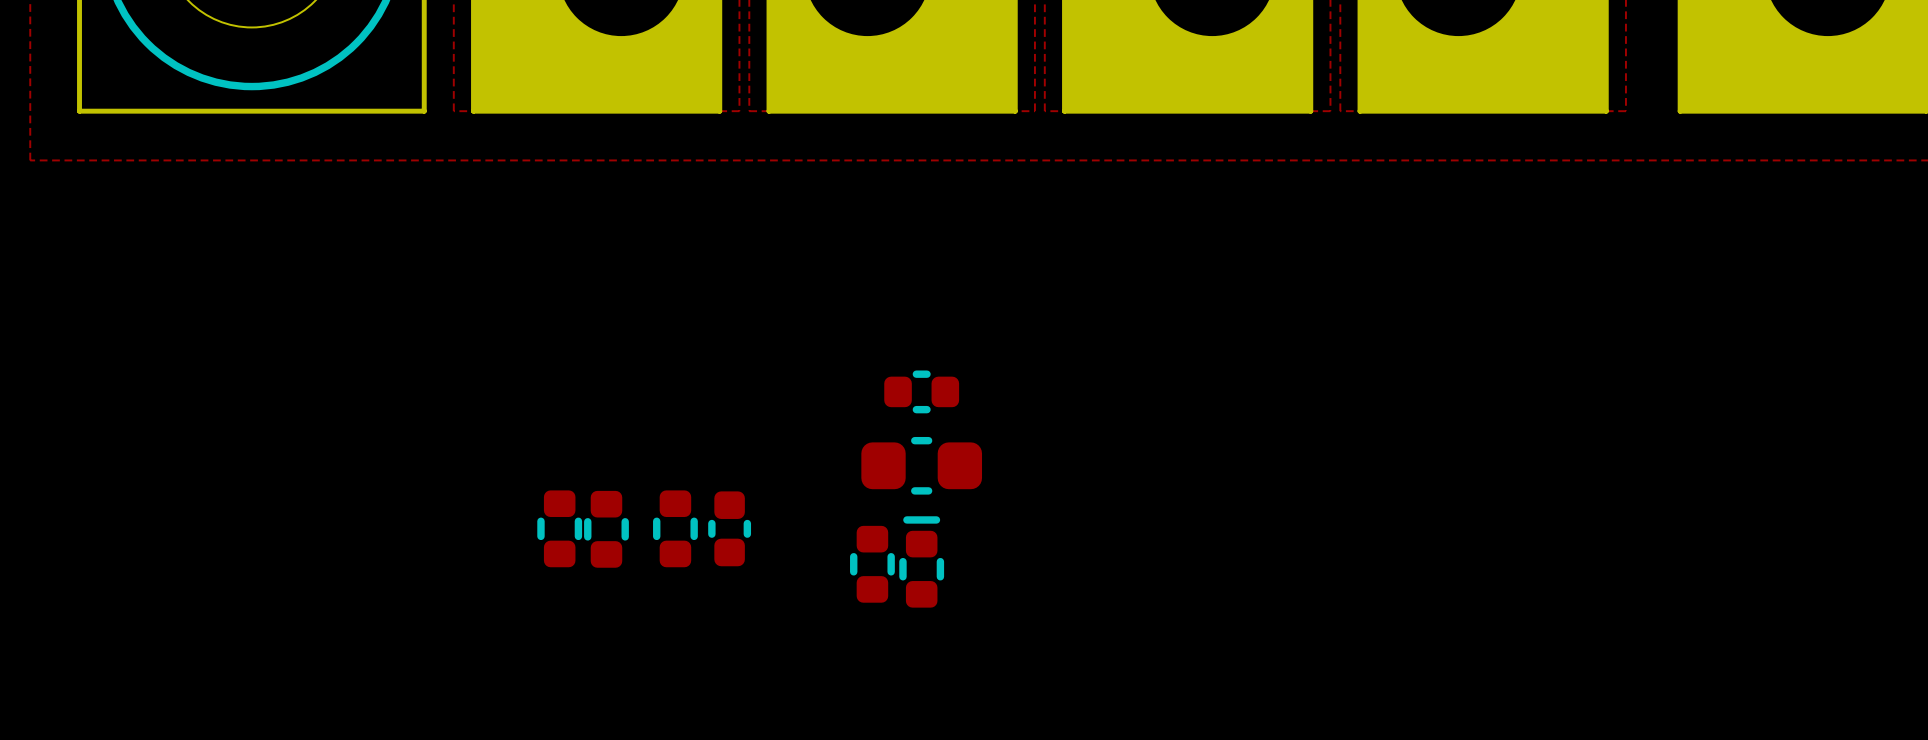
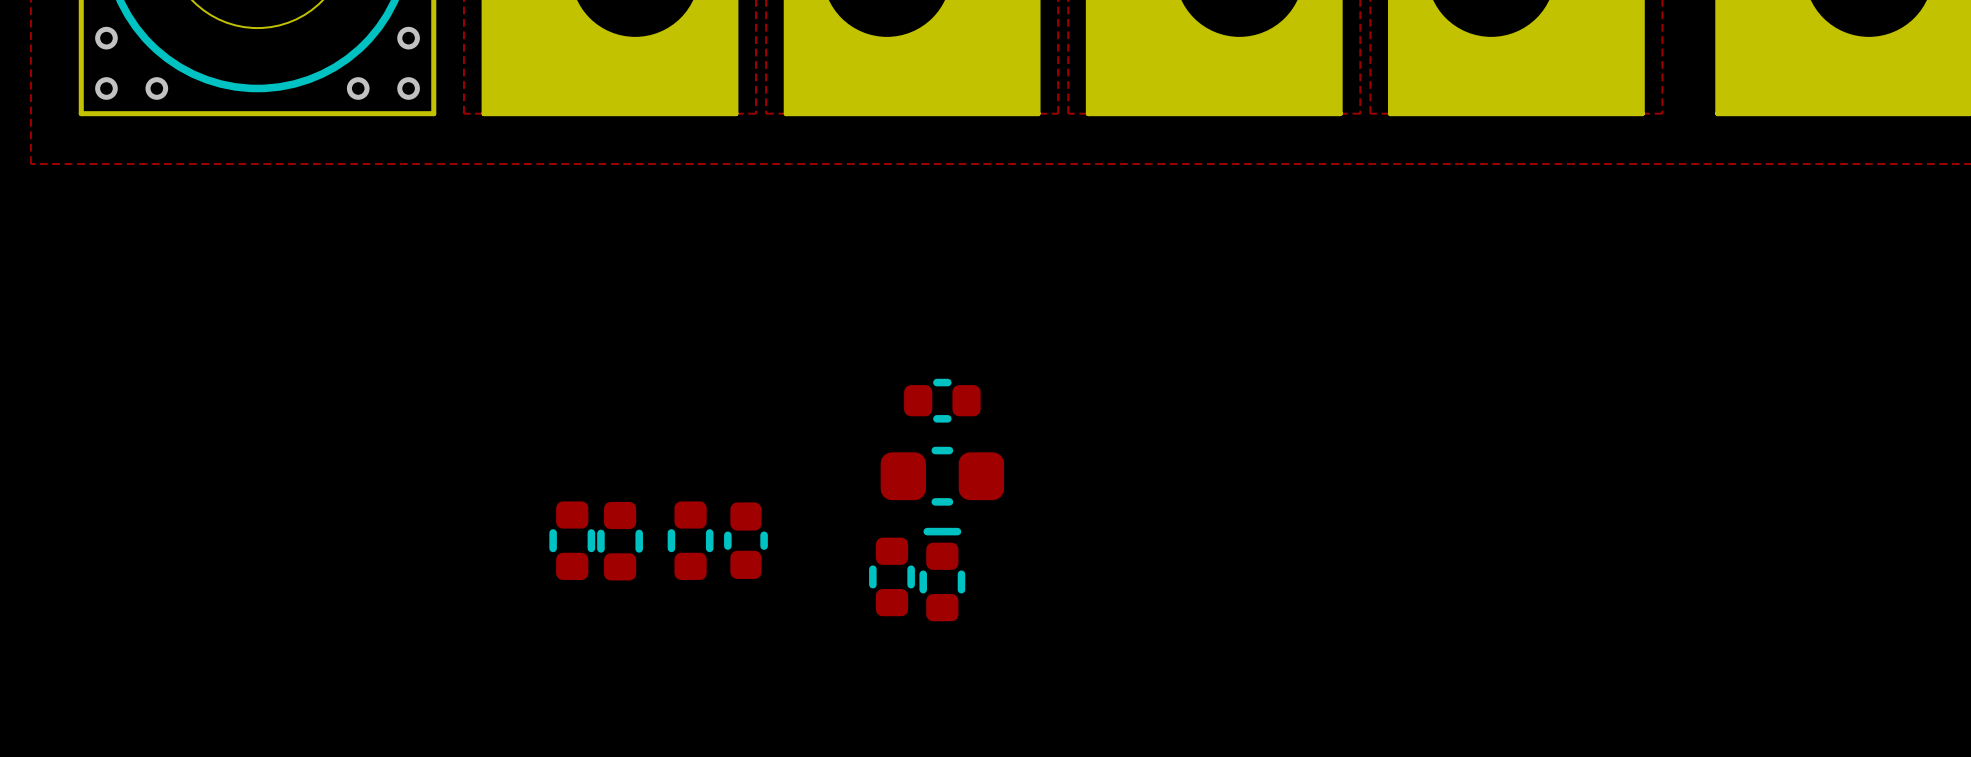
via: none -> (106, 38)
via: none -> (408, 38)
via: none -> (106, 88)
via: none -> (156, 88)
via: none -> (358, 88)
via: none -> (408, 88)

